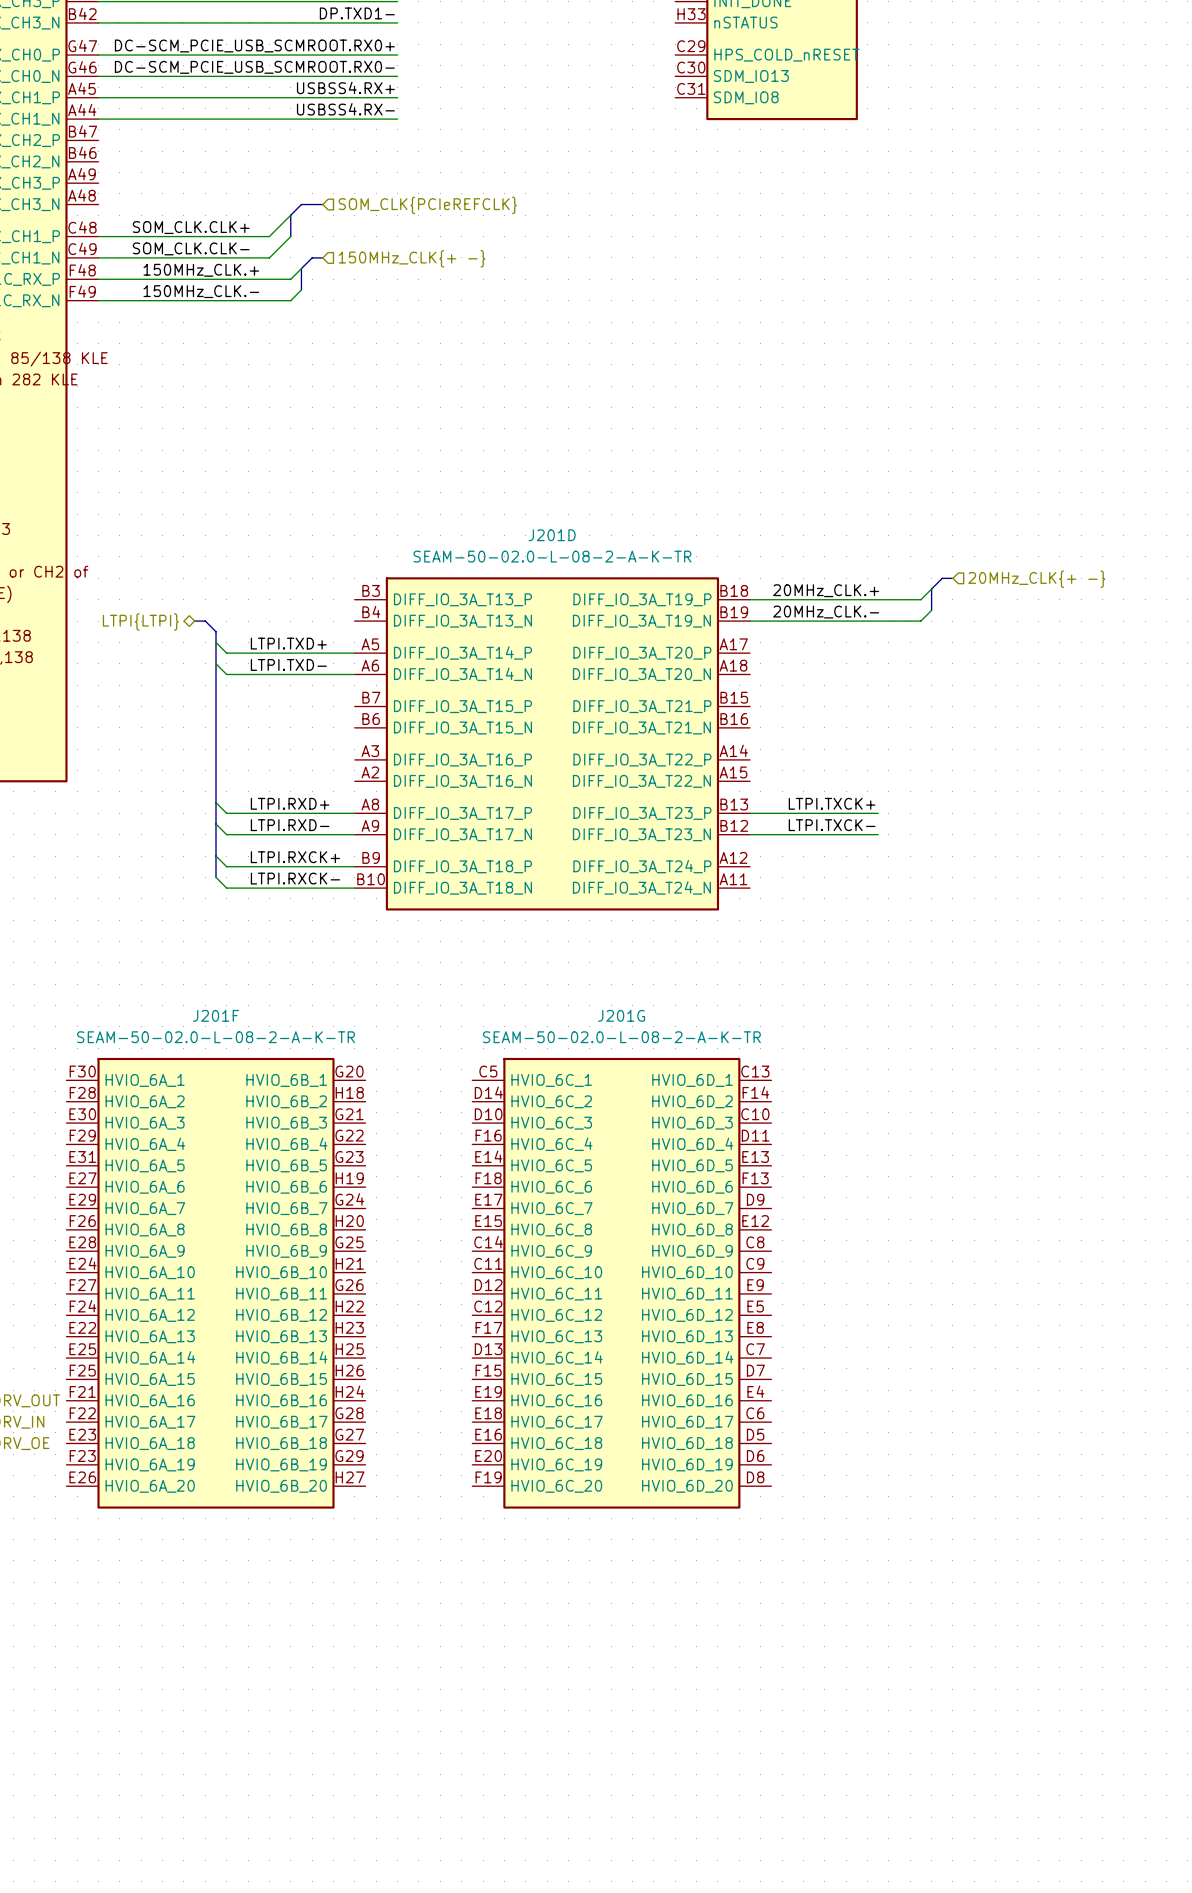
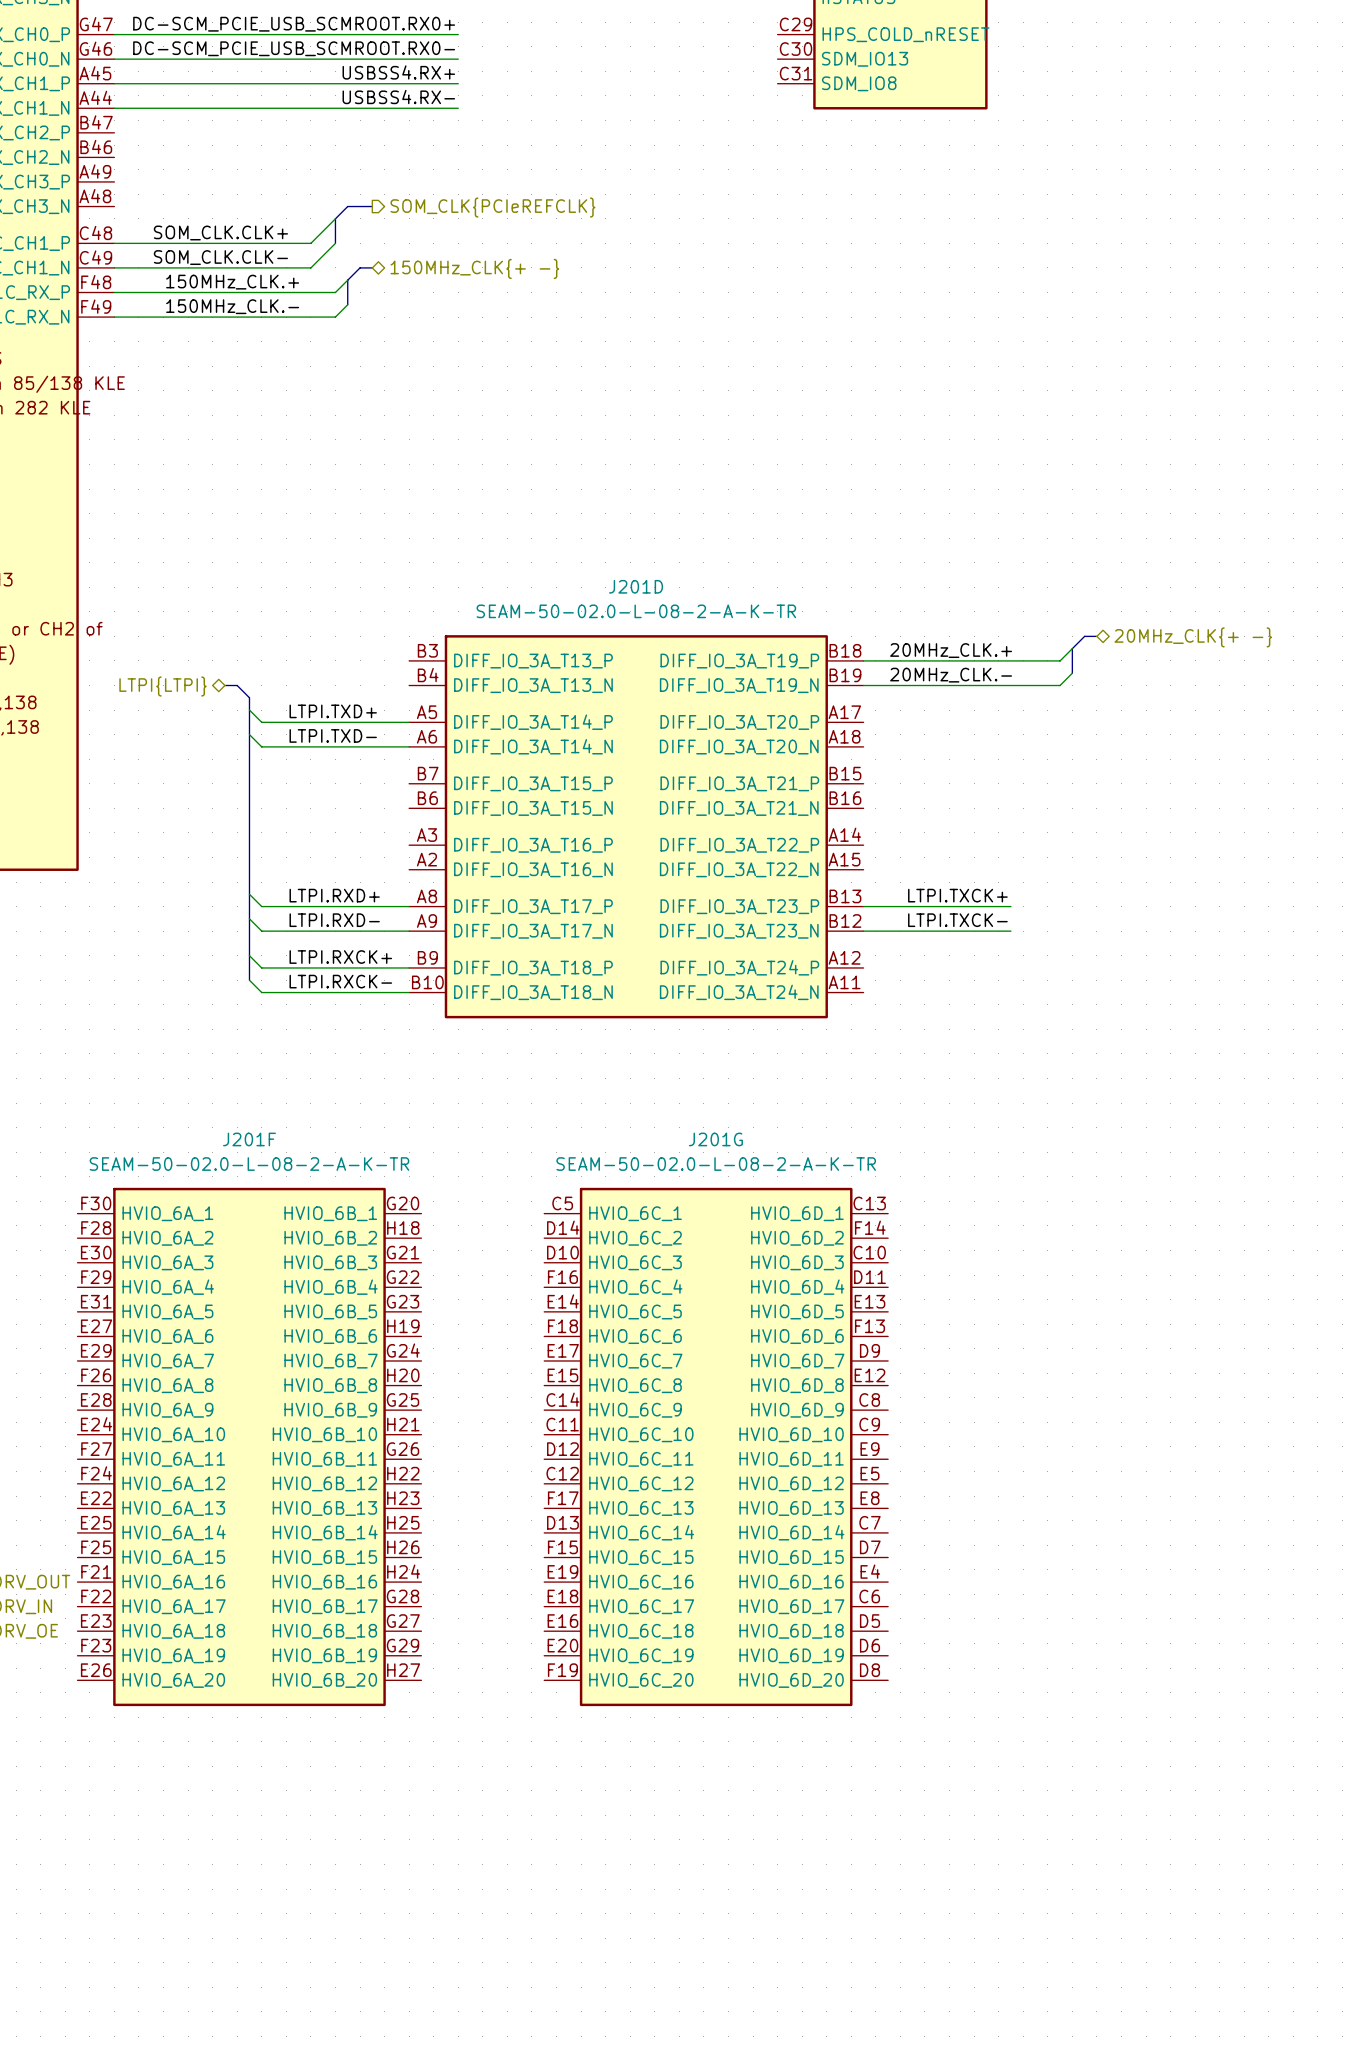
hierarchical label shape: input (427, 205) -> output (492, 207)
hierarchical label shape: input (411, 258) -> bidirectional (474, 268)
hierarchical label shape: input (1036, 579) -> bidirectional (1193, 637)

